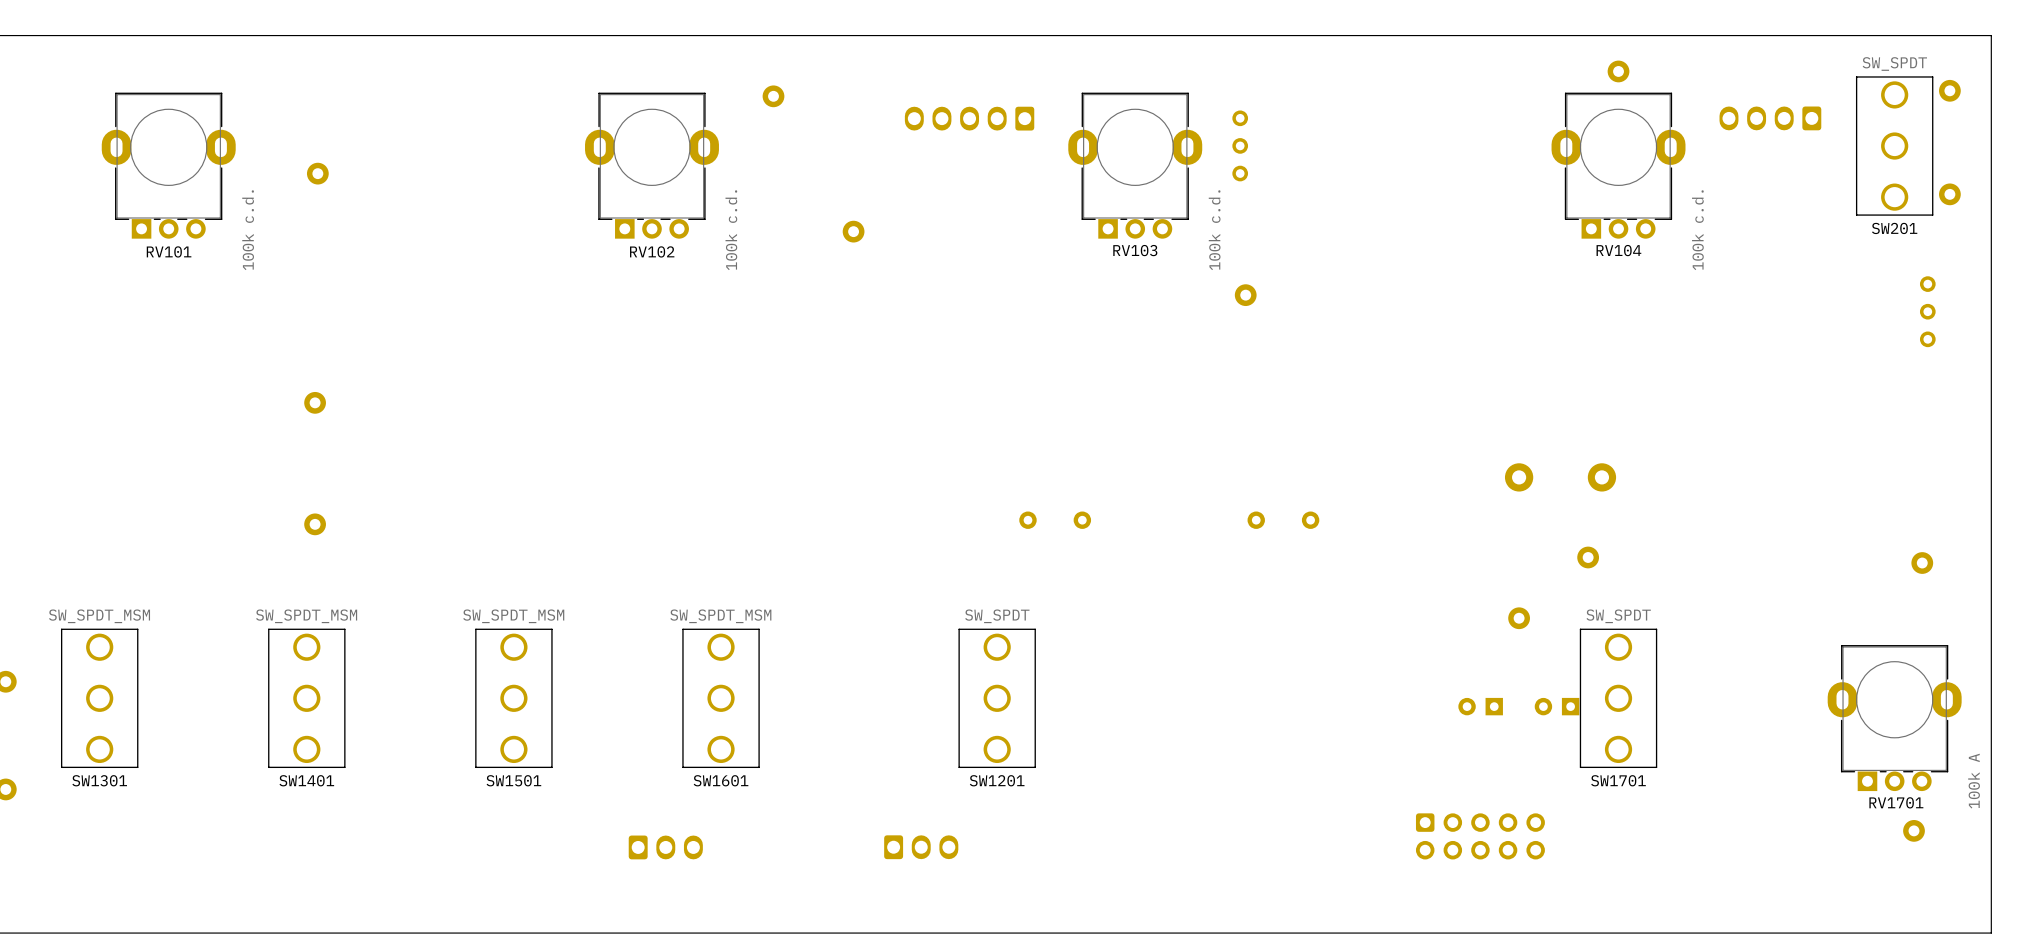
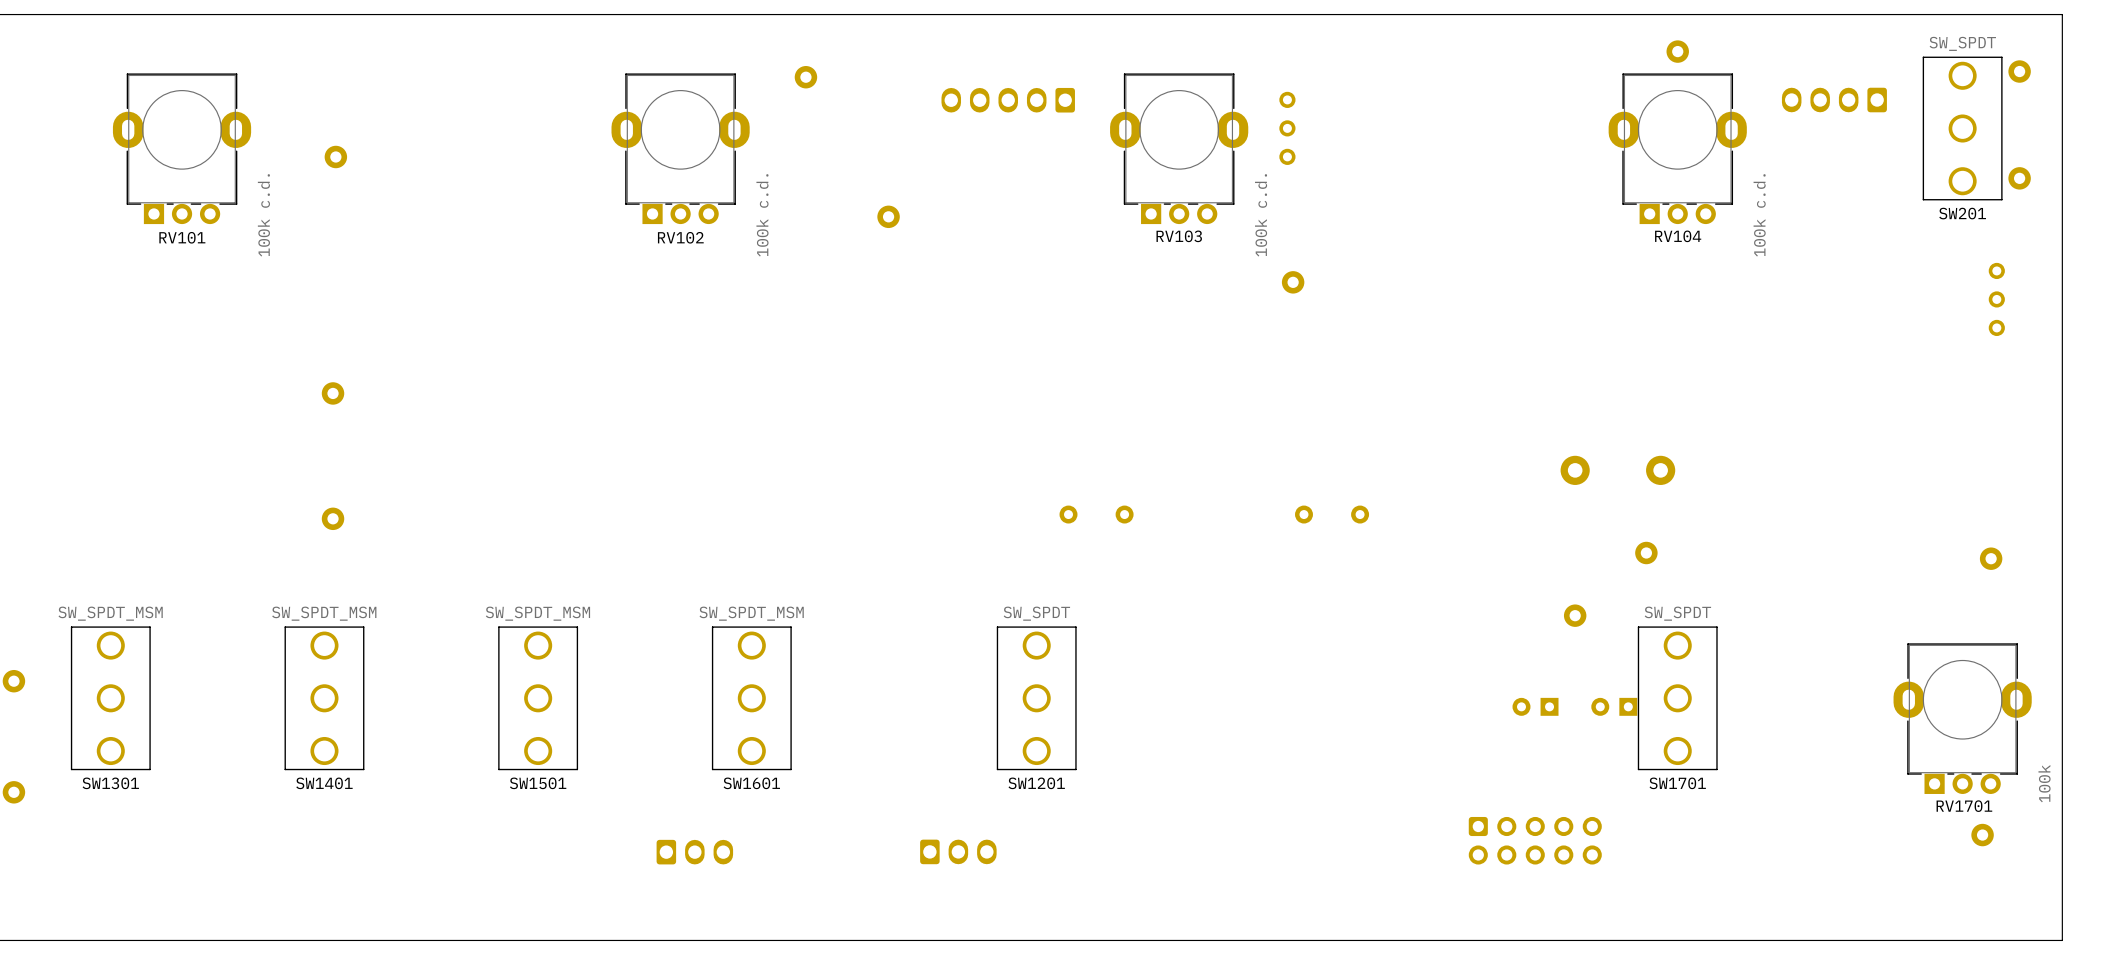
RV1701 value: 100k A (1974, 781) -> 100k (2044, 783)

